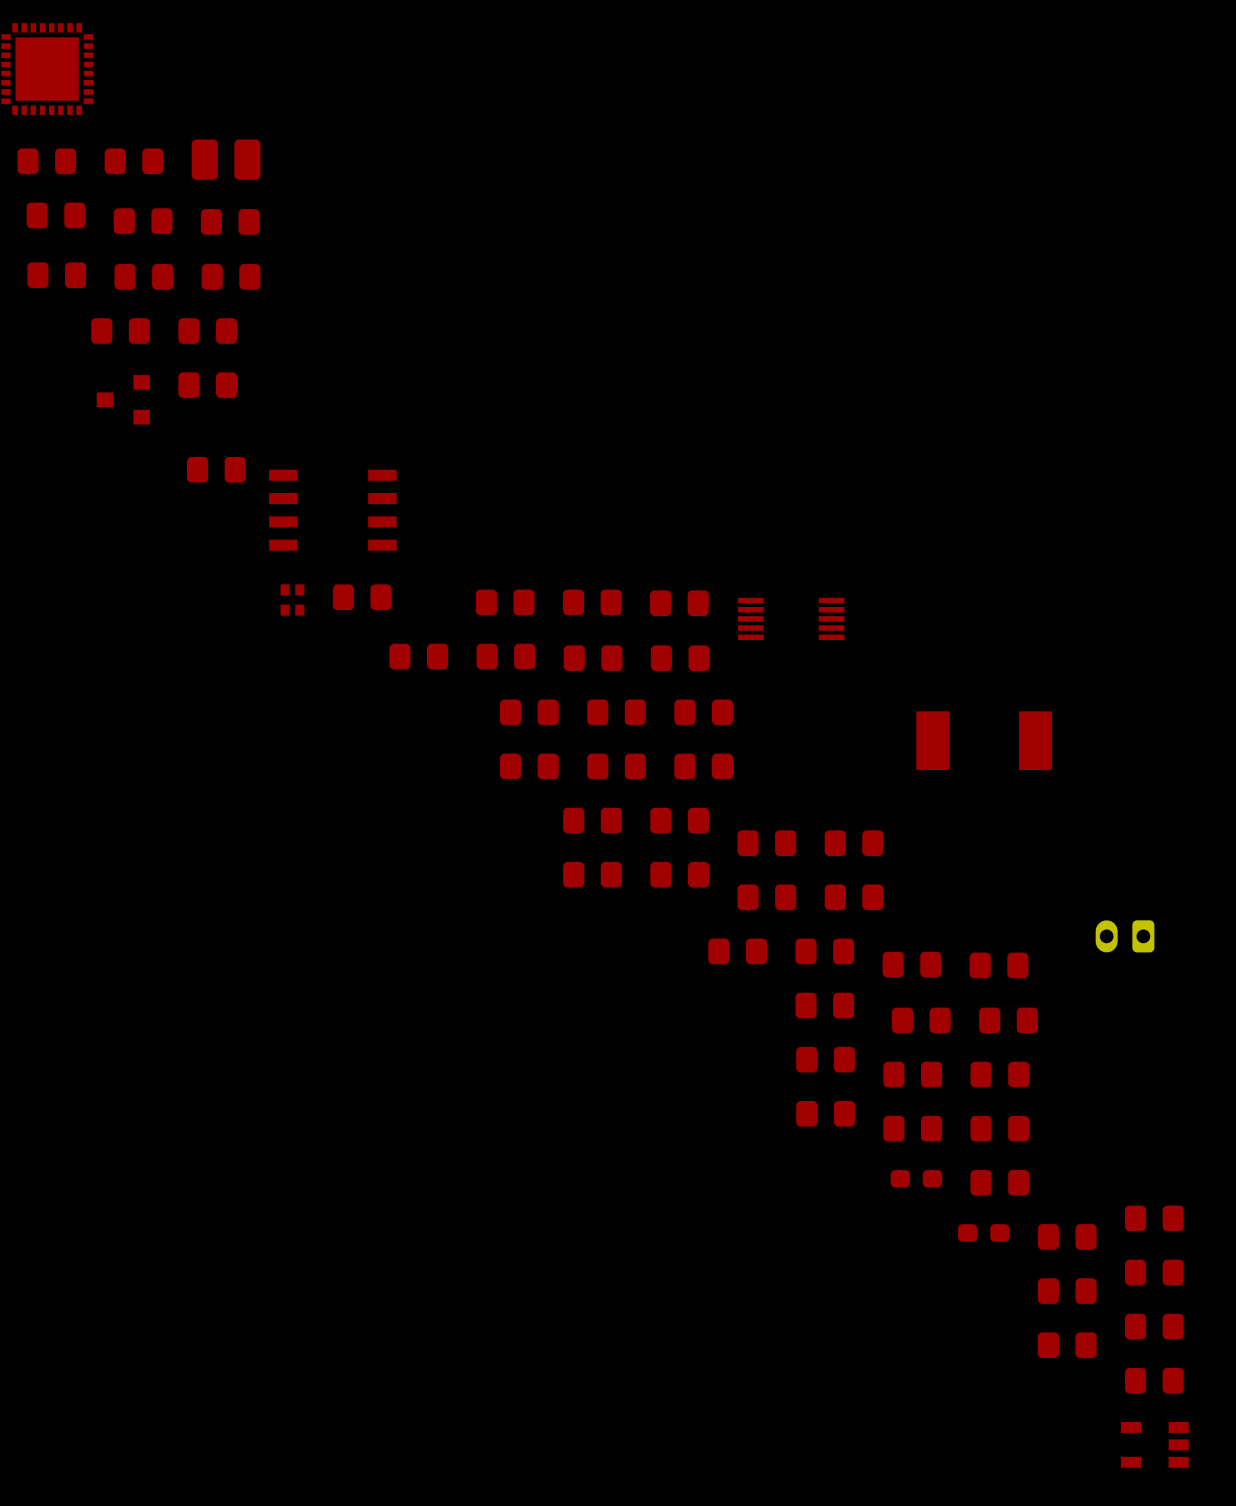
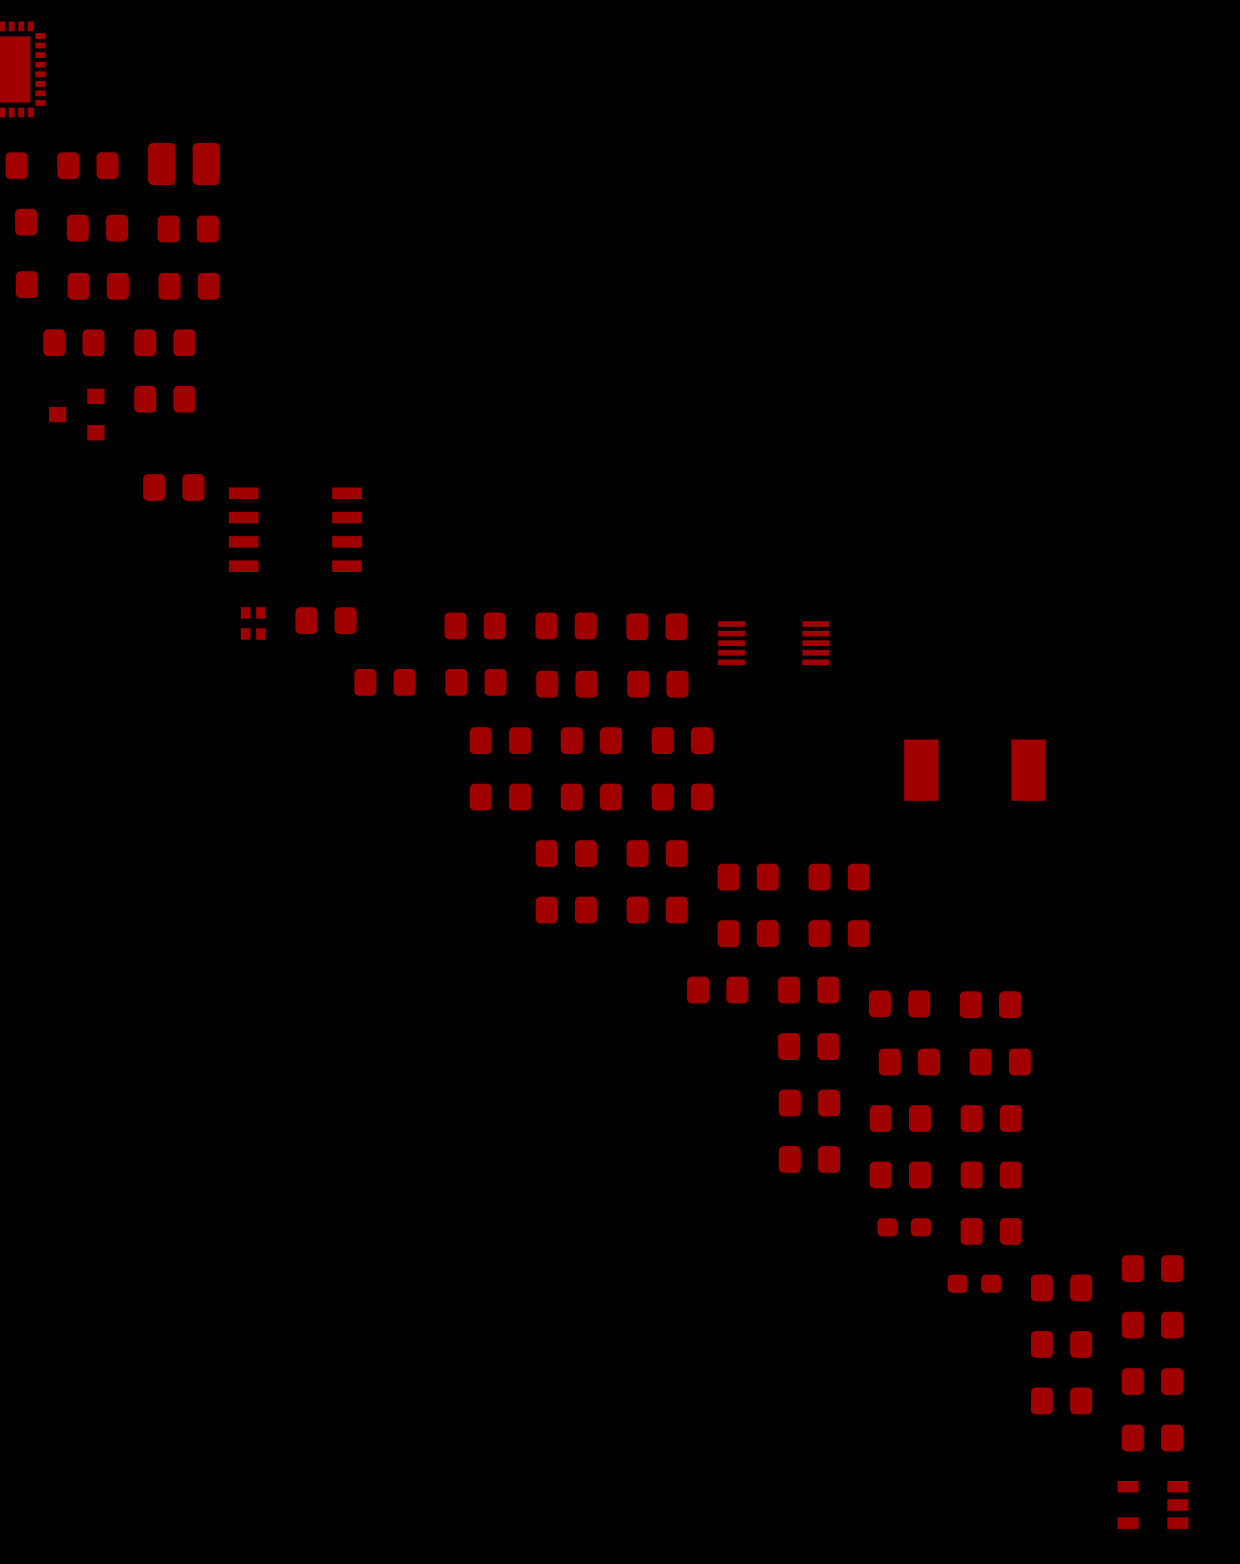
part: (1125, 936) -> none

